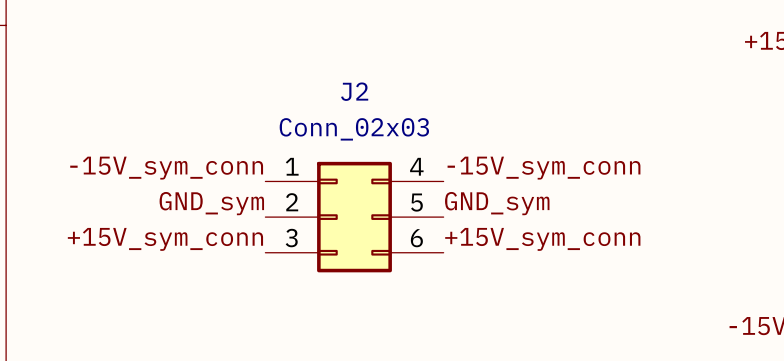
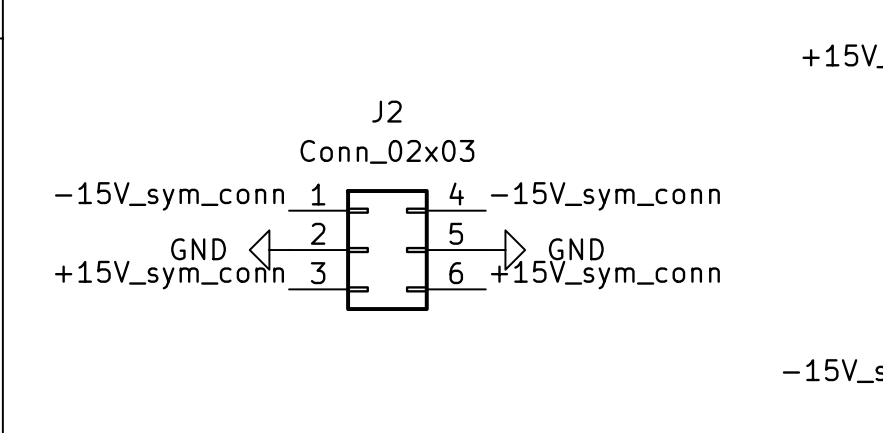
label: GND_sym (211, 203) -> none
label: GND_sym (497, 203) -> none
power symbol: none -> GND (269, 250)
power symbol: none -> GND (505, 250)

